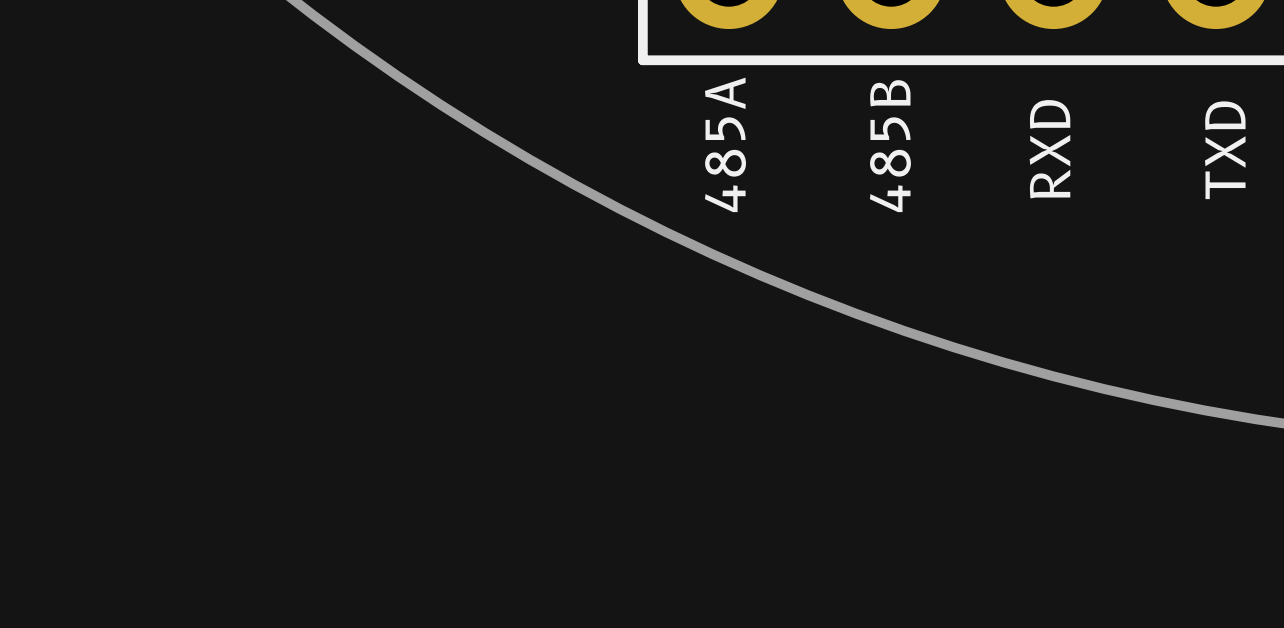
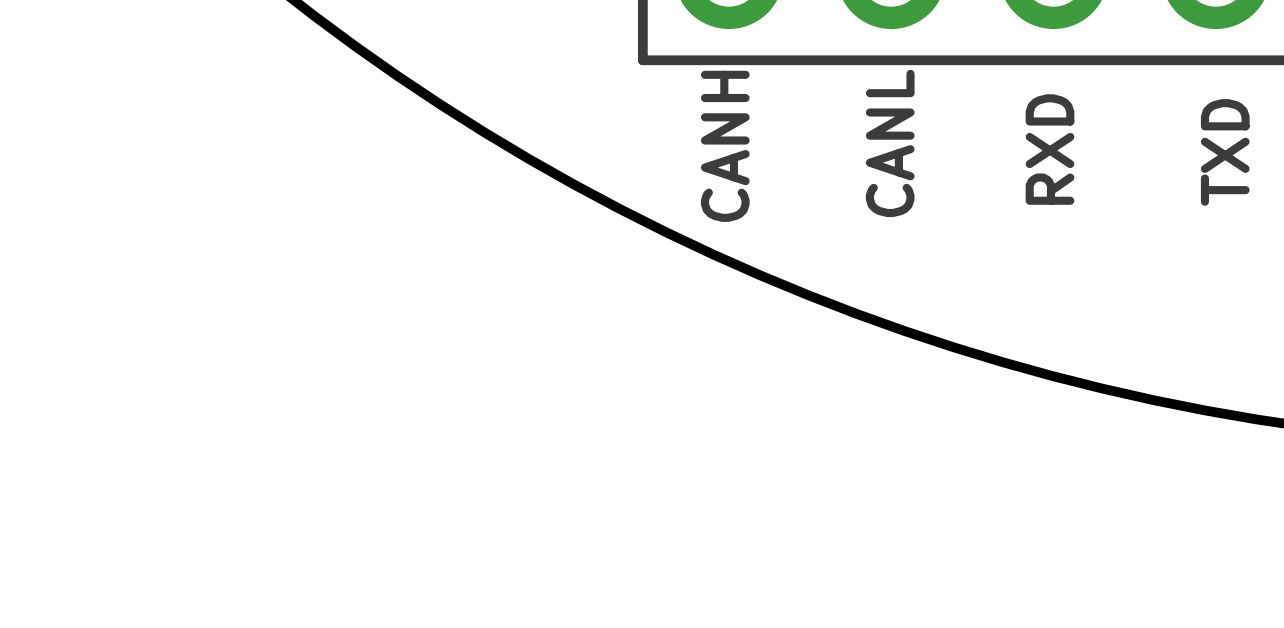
text: 485A (725, 144) -> CANH (725, 146)
text: 485B (890, 146) -> CANL (890, 143)

